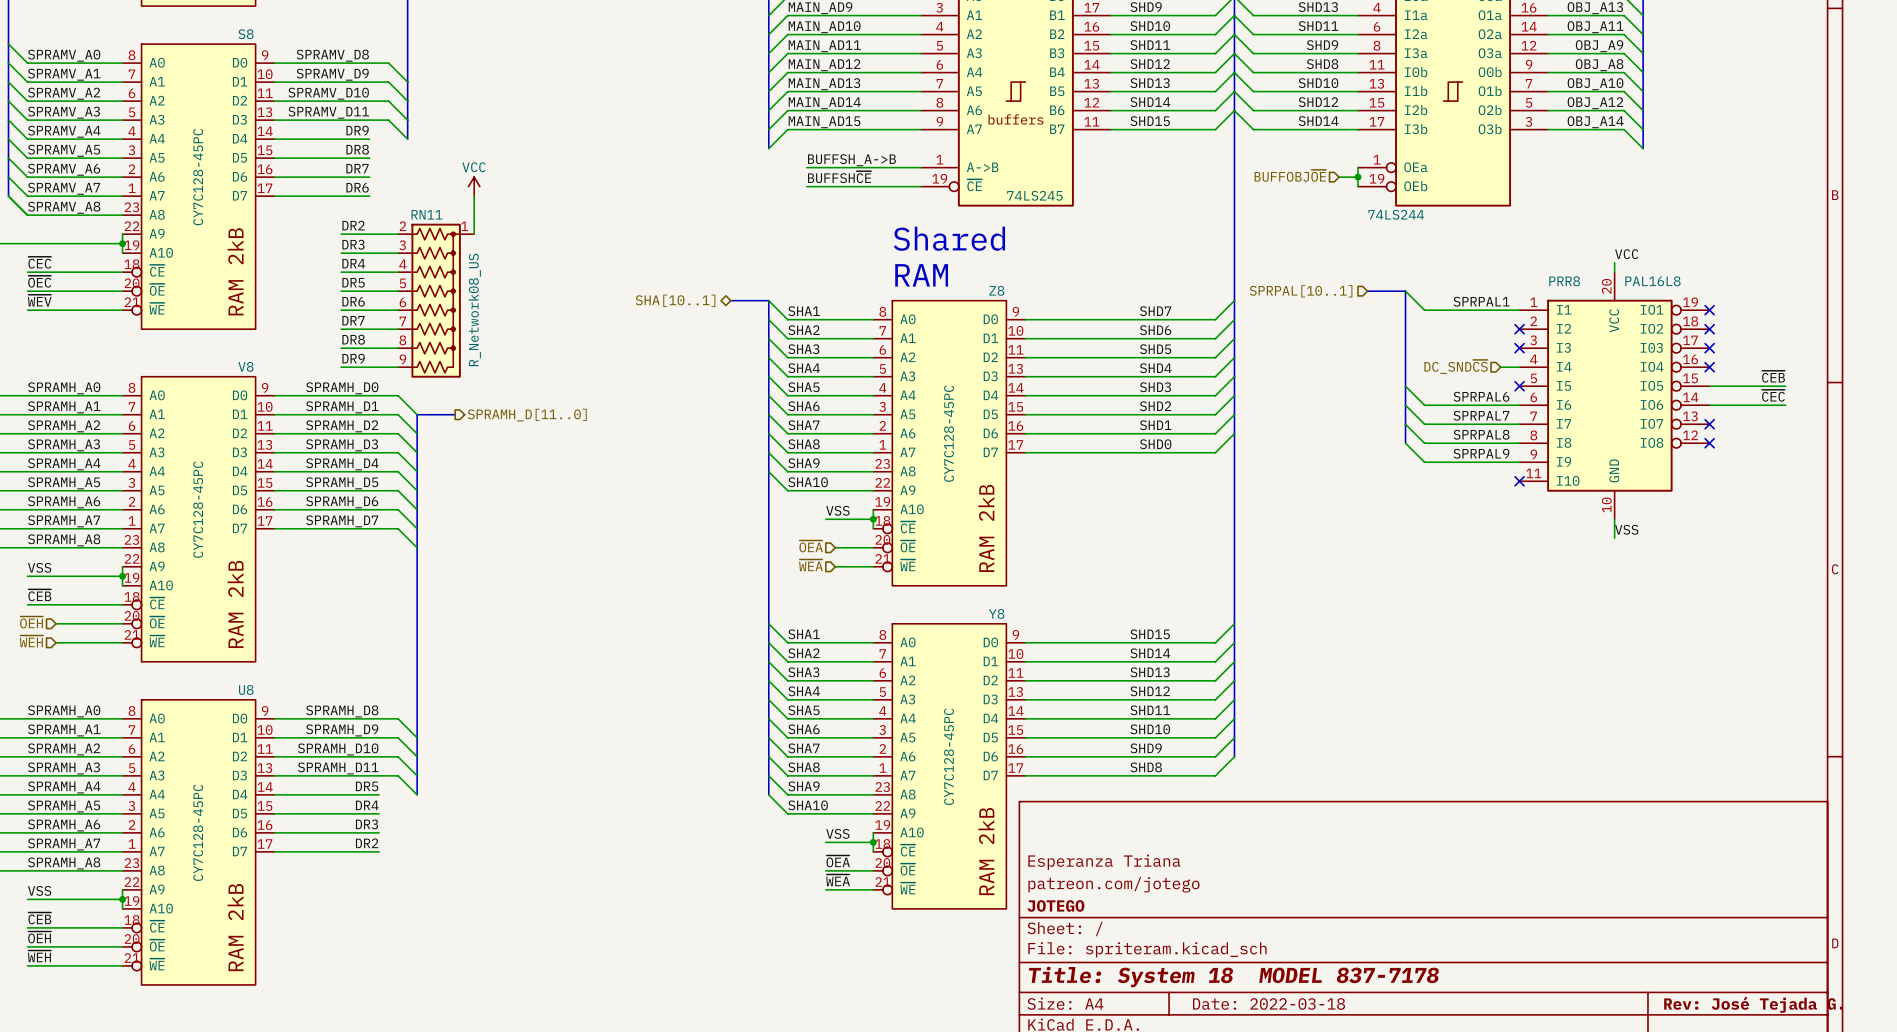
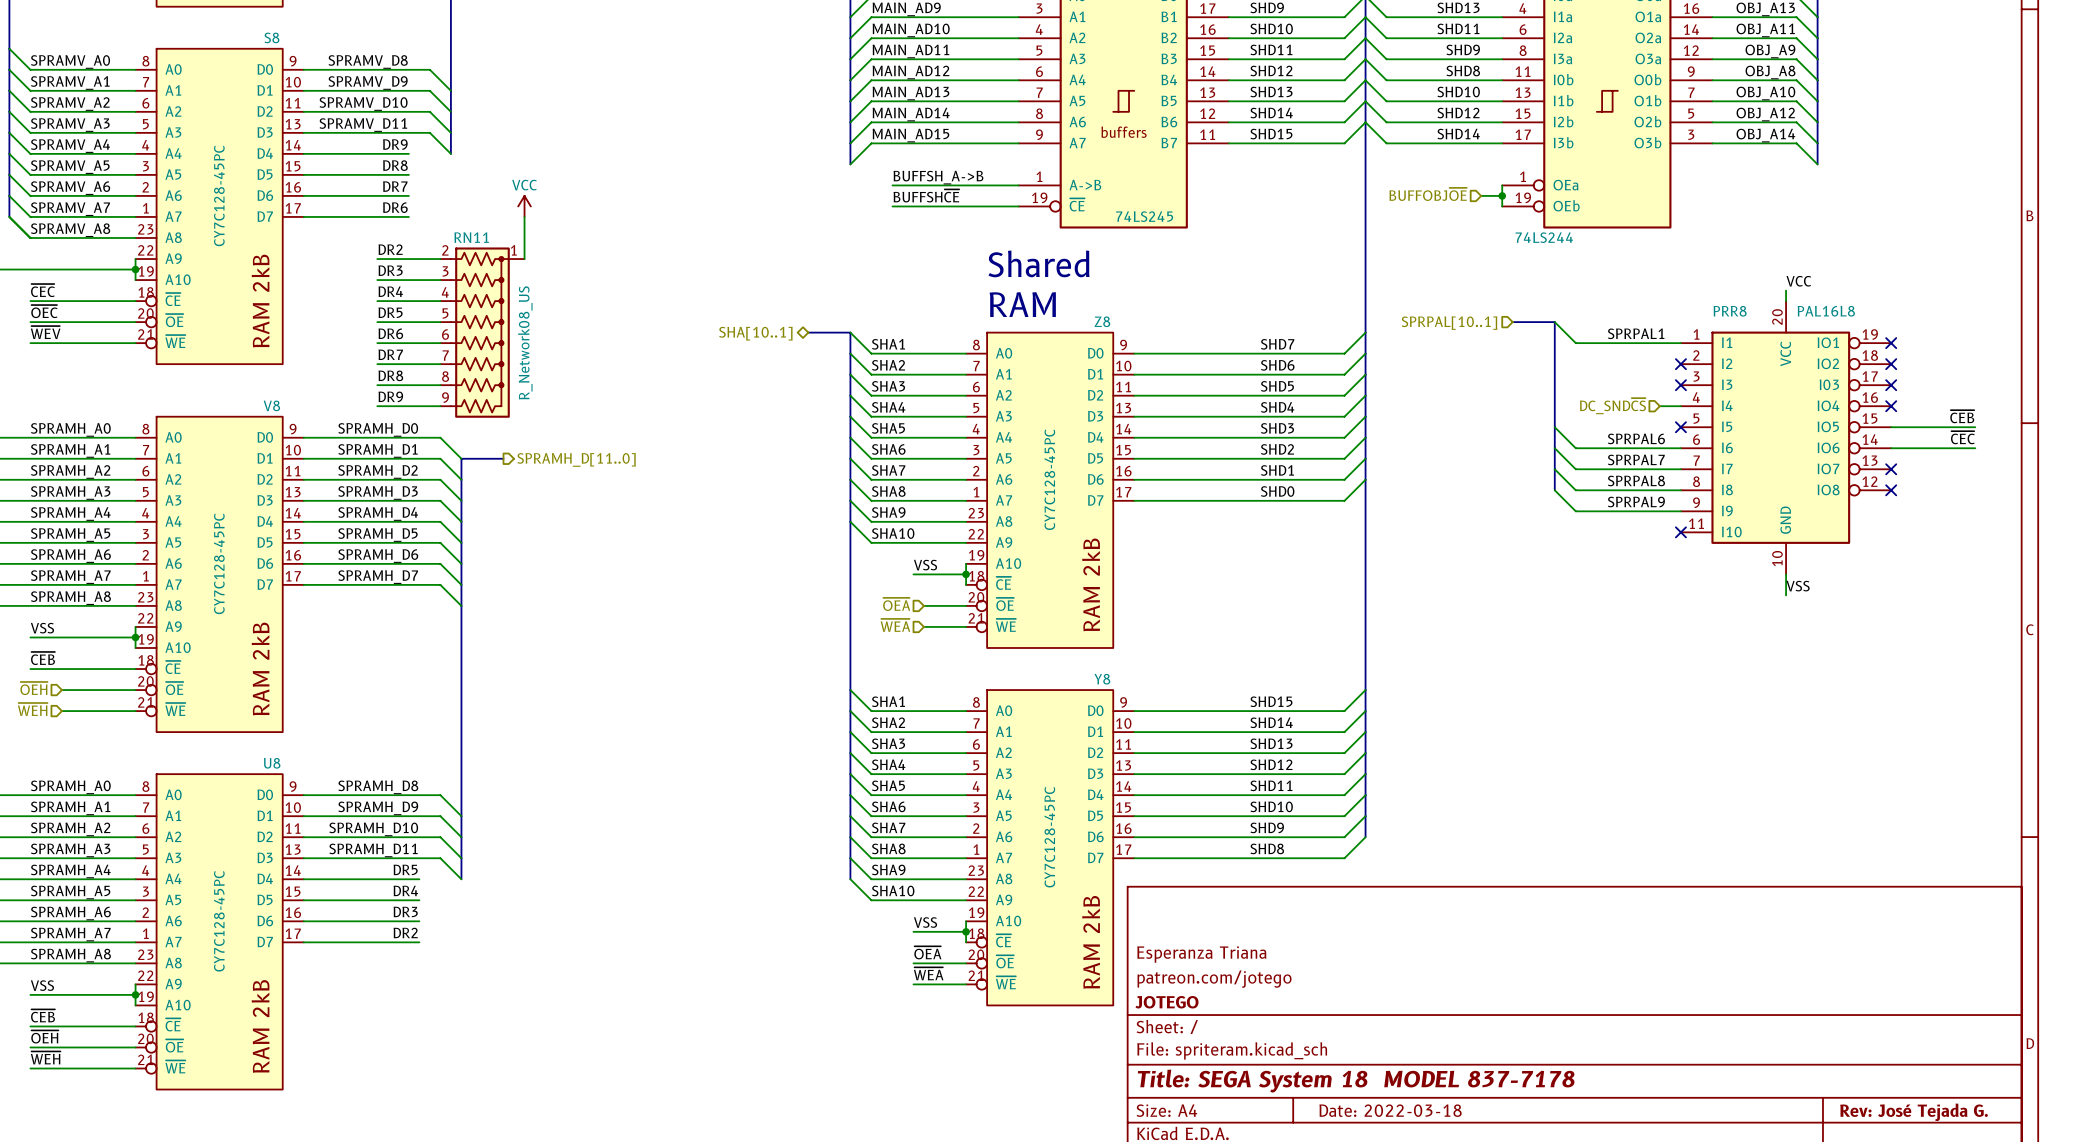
title block: Title: System 18 MODEL 837-7178 (1233, 976) -> Title: SEGA System 18 MODEL 837-7178 (1356, 1081)

